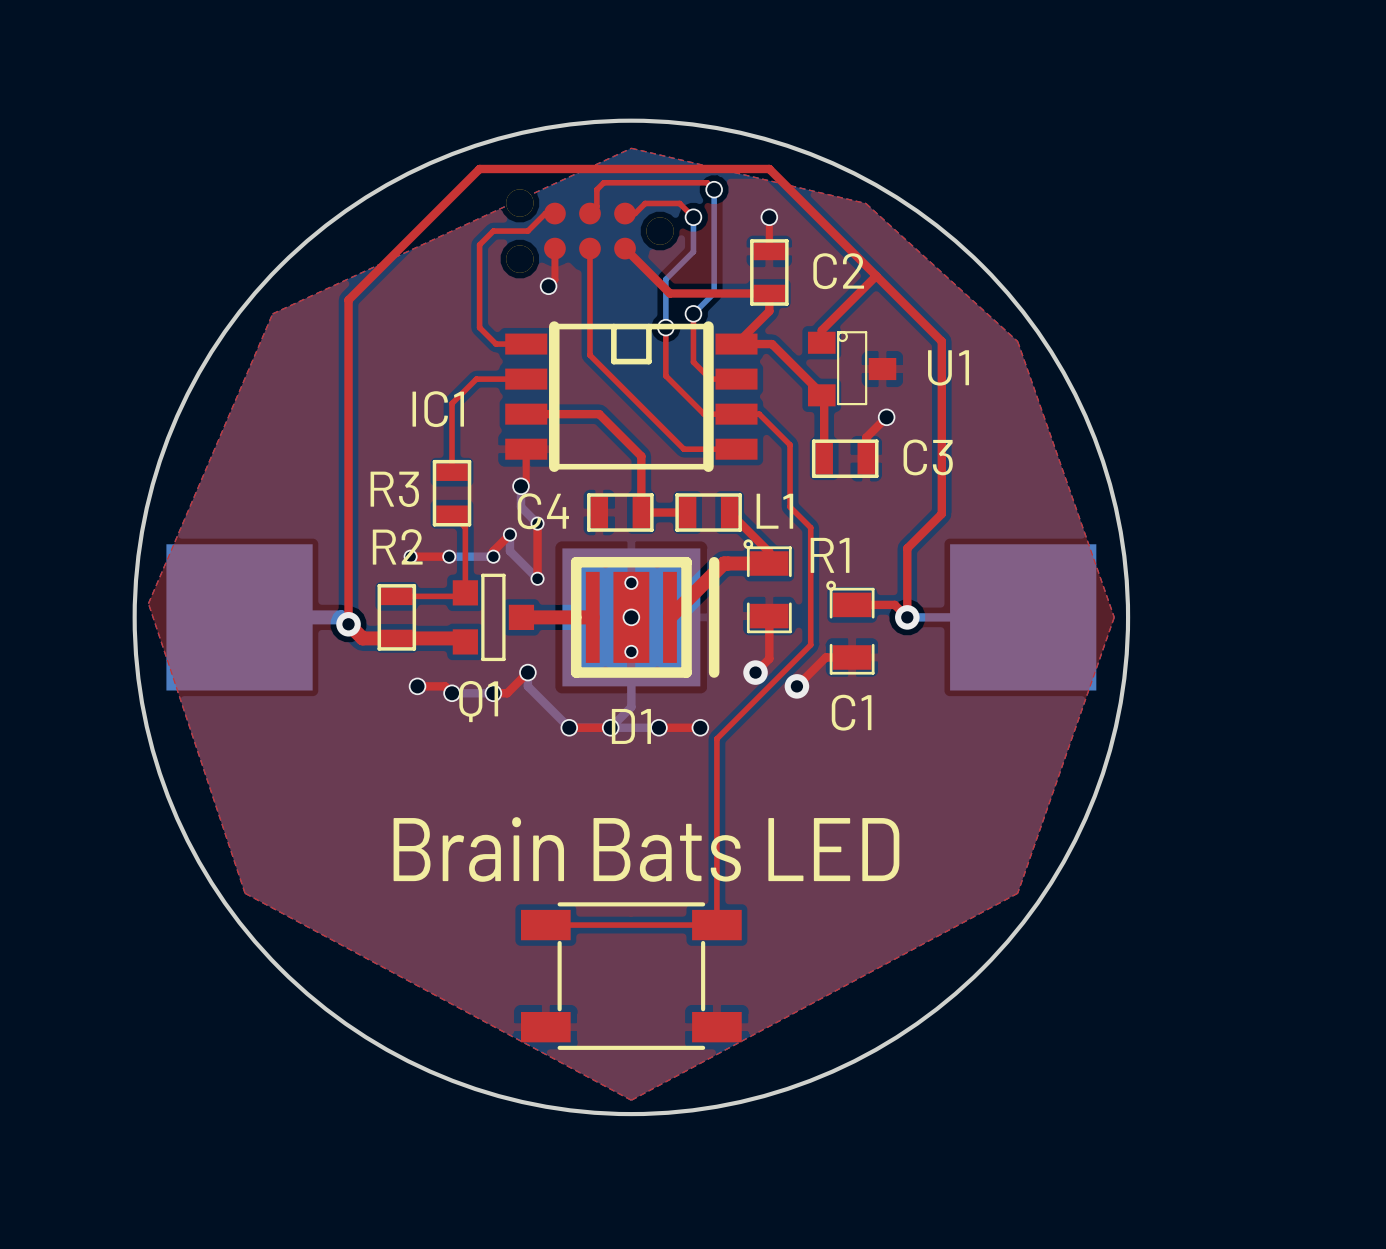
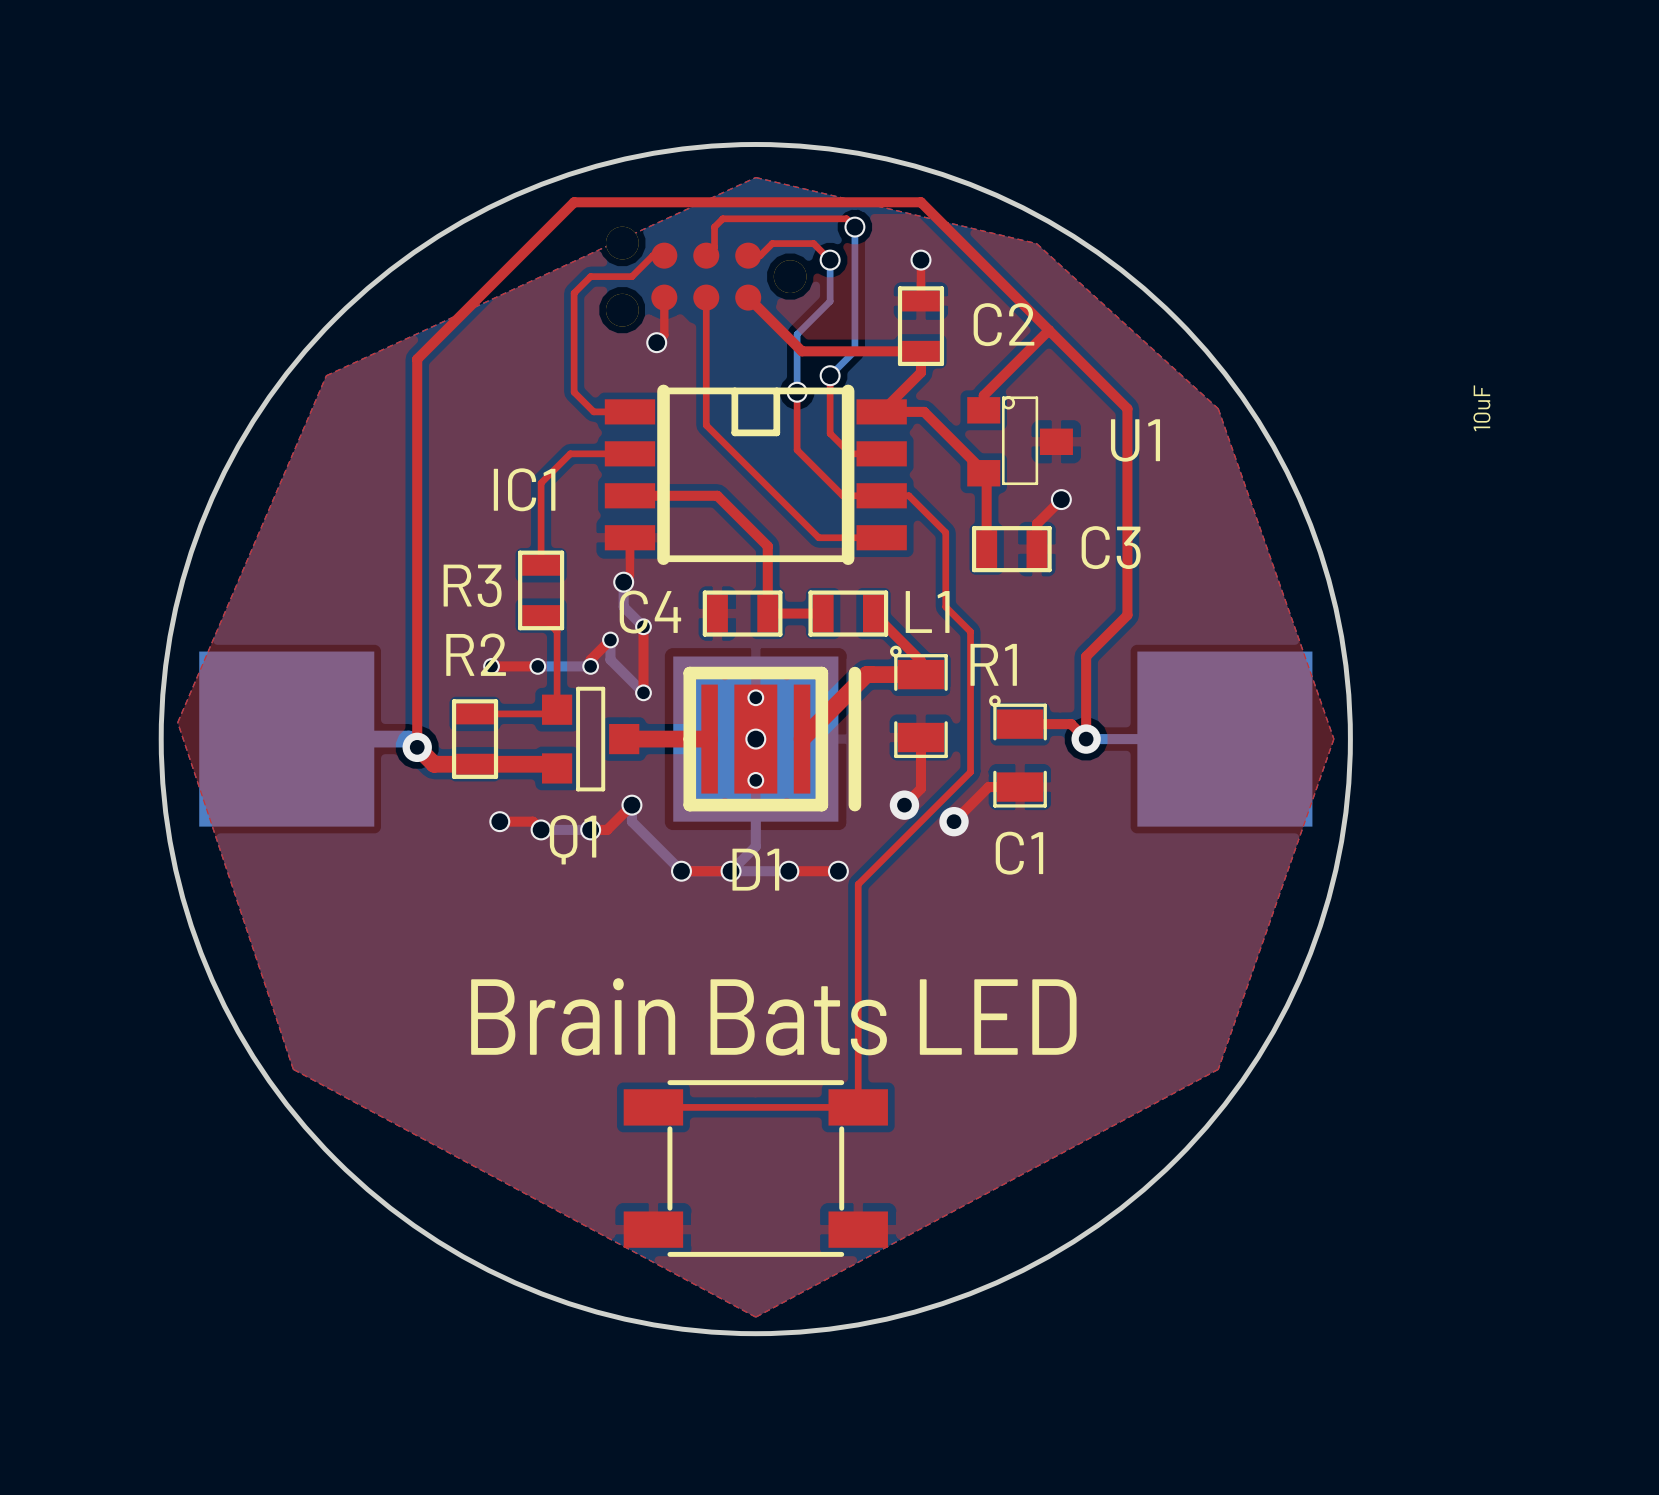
C1 value: none -> 10uF (1481, 408)

